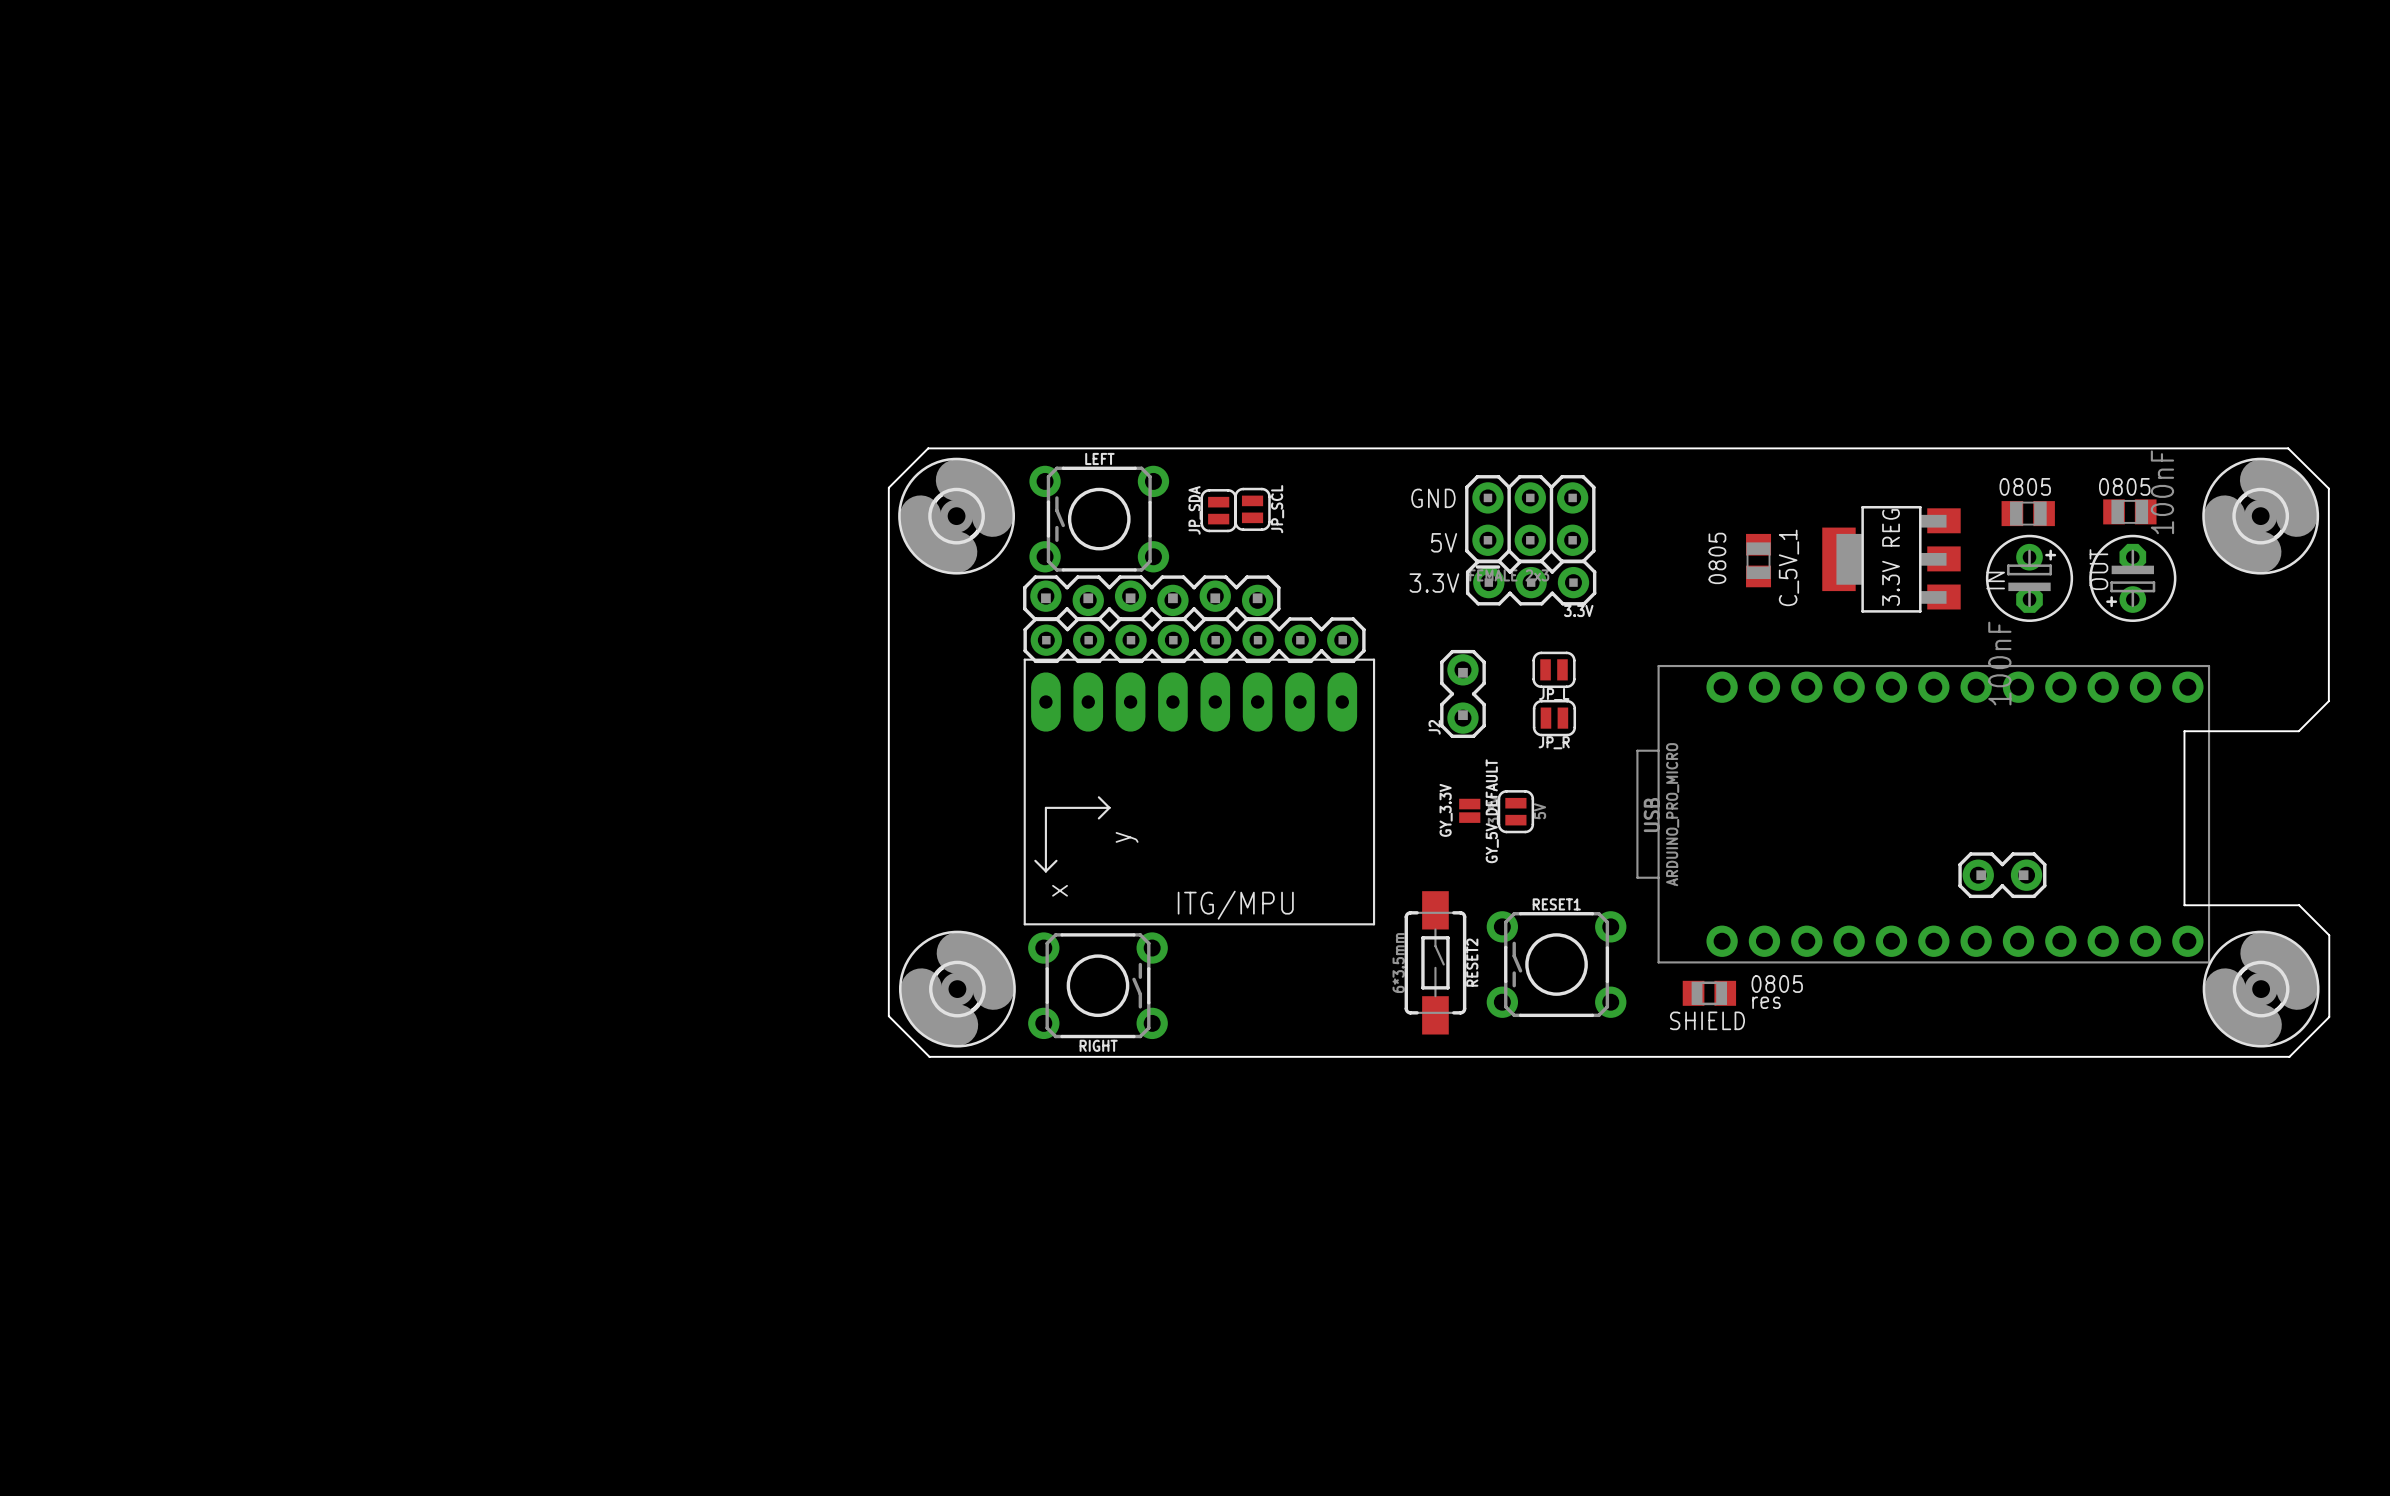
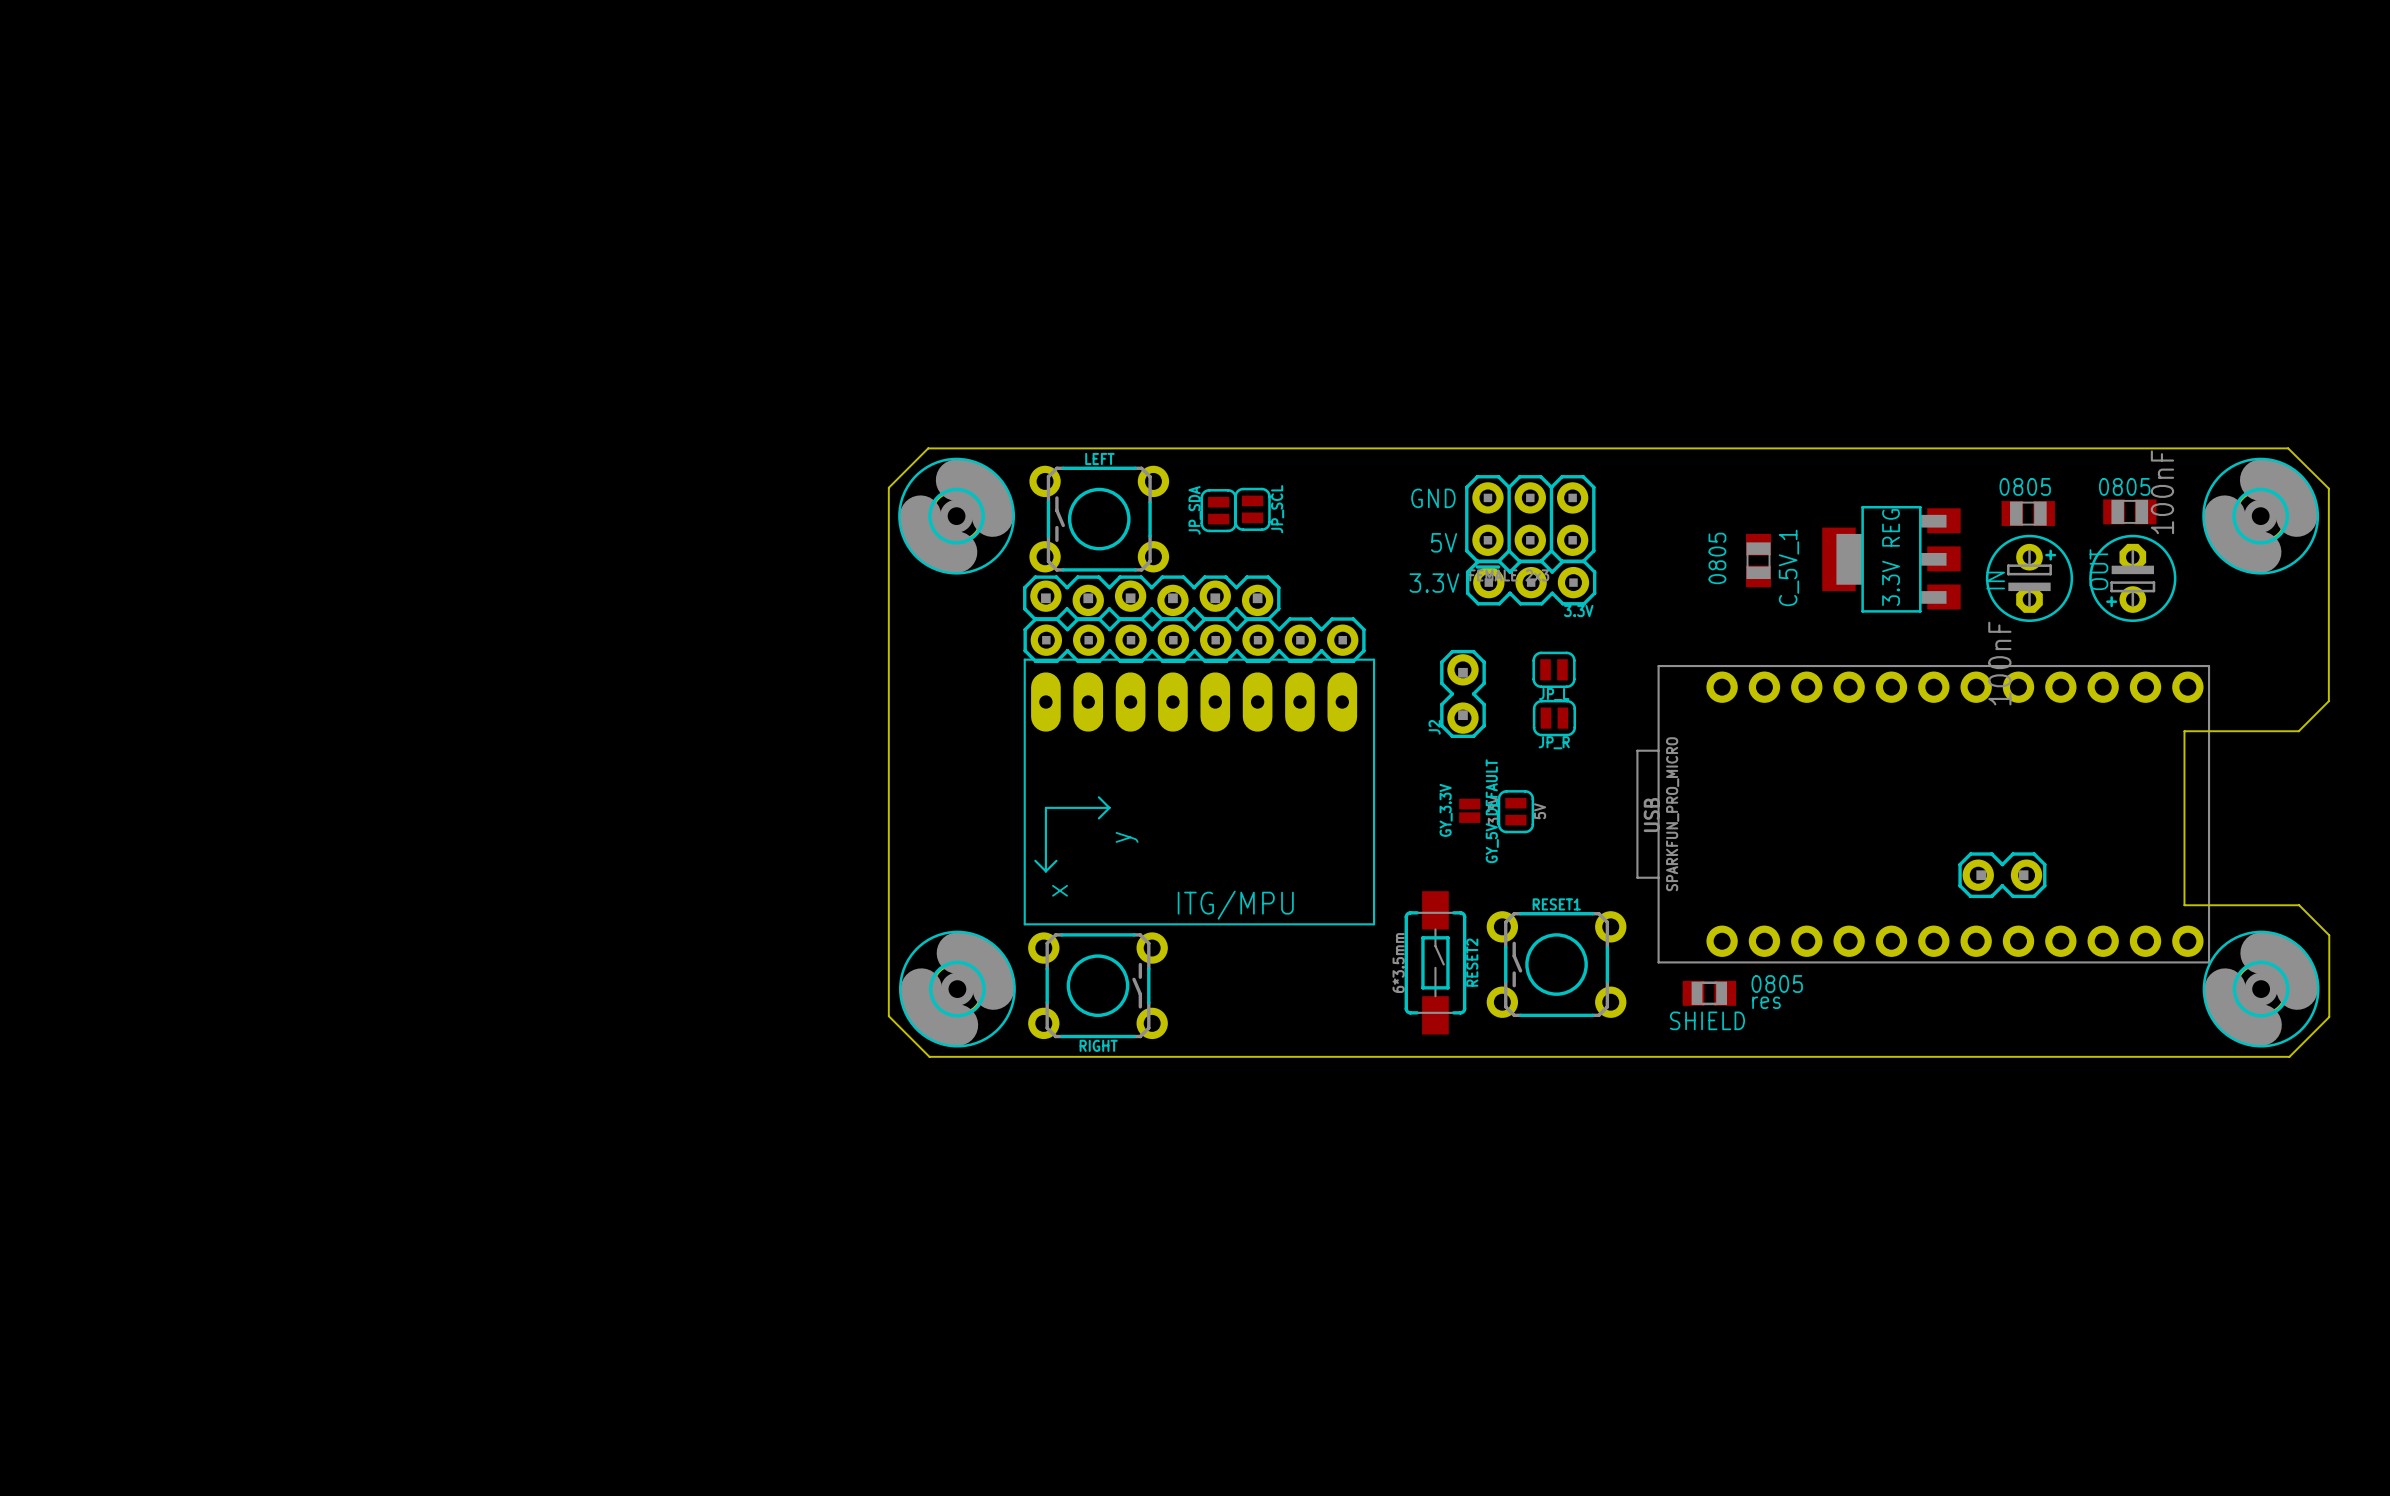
part value: ARDUINO_PRO_MICRO (1672, 814) -> SPARKFUN_PRO_MICRO (1672, 814)

